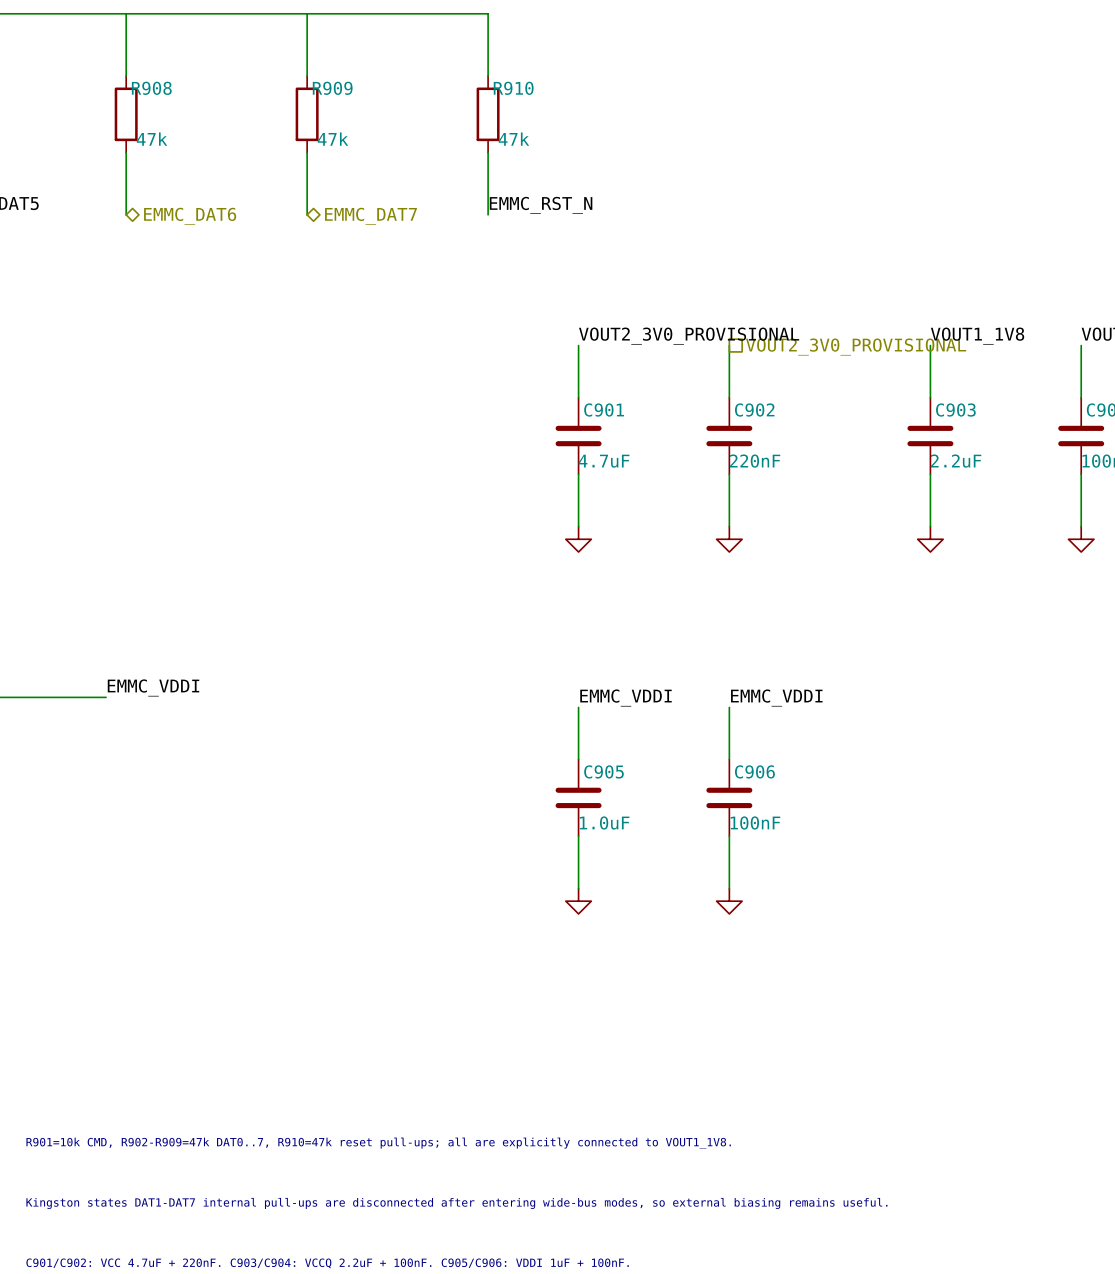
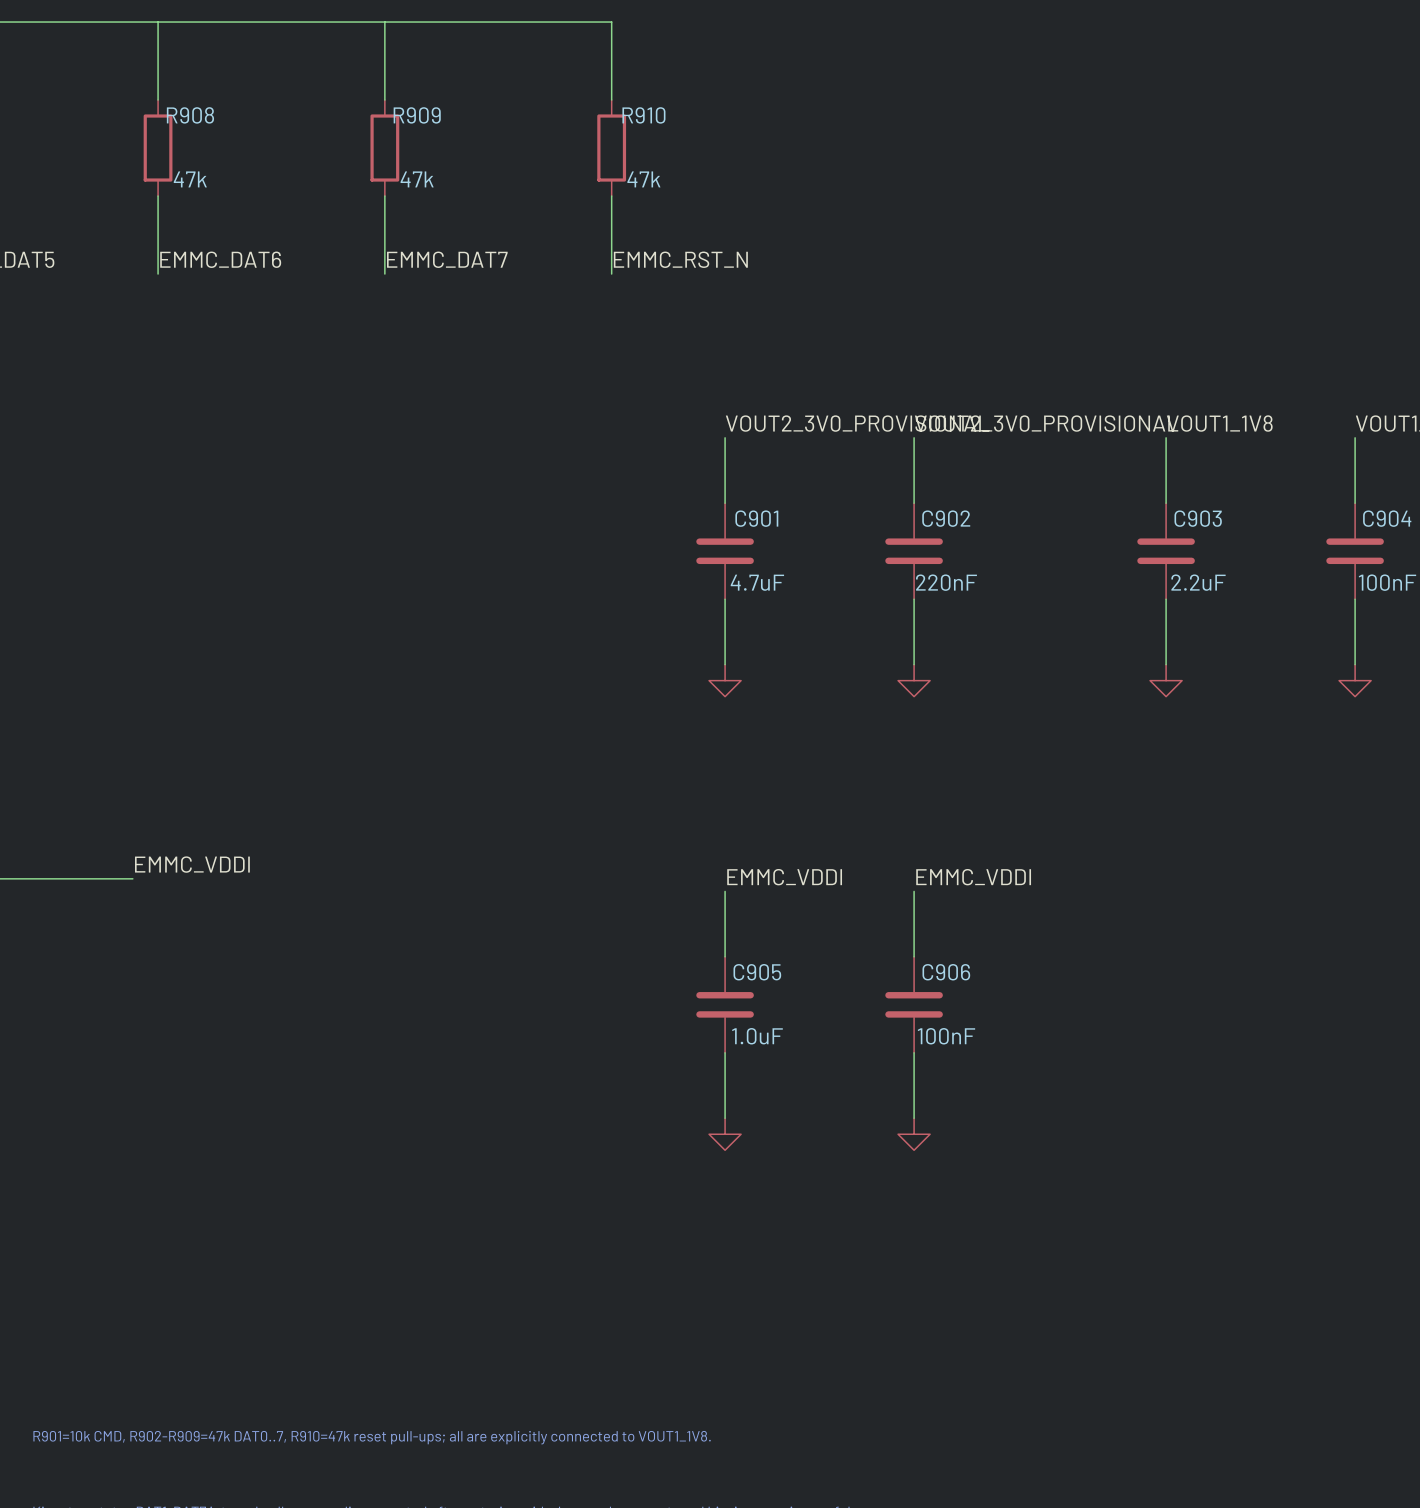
label: none -> EMMC_DAT6 (220, 259)
label: none -> EMMC_DAT7 (447, 259)
hierarchical label: EMMC_DAT6 (190, 216) -> none
hierarchical label: EMMC_DAT7 (370, 216) -> none
label: none -> VOUT2_3V0_PROVISIONAL (1046, 423)
hierarchical label: VOUT2_3V0_PROVISIONAL (856, 347) -> none

